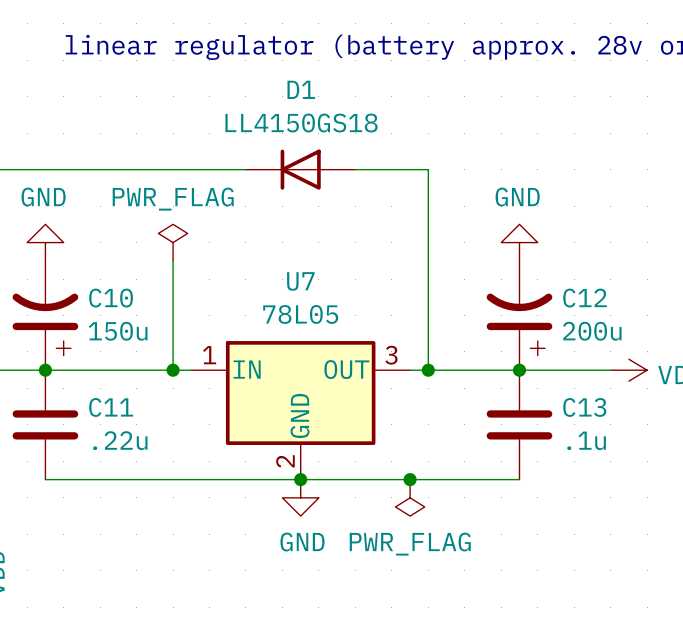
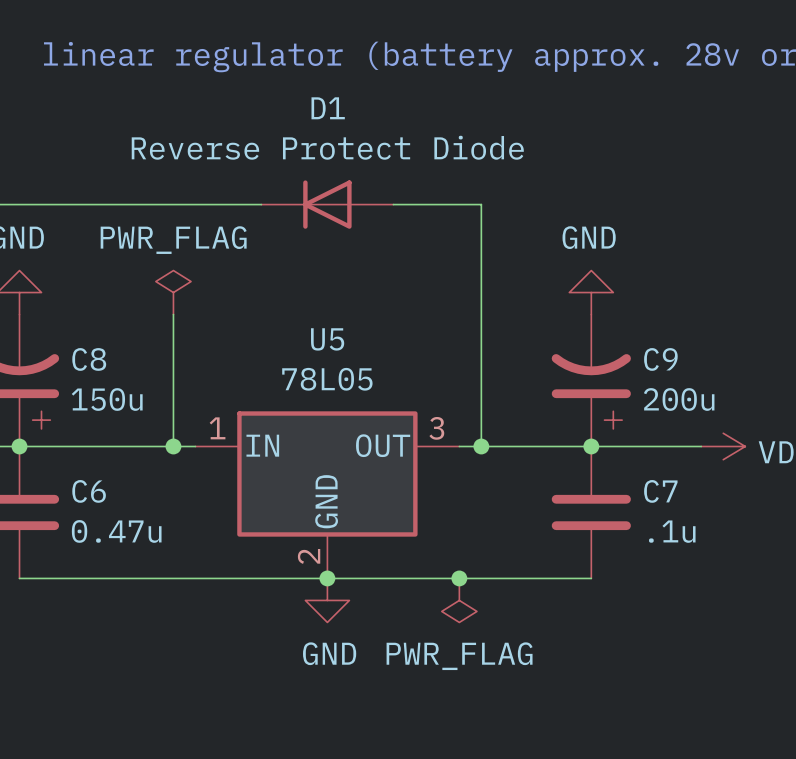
D1 value: LL4150GS18 (301, 123) -> Reverse Protect Diode (327, 147)
U7 name: U7 (300, 281) -> U5 (327, 339)
C10 name: C10 (111, 298) -> C8 (89, 359)
C12 name: C12 (585, 298) -> C9 (660, 359)
C11 name: C11 (111, 407) -> C6 (89, 491)
C13 name: C13 (584, 407) -> C7 (660, 491)
C11 value: .22u (120, 440) -> 0.47u (116, 531)

